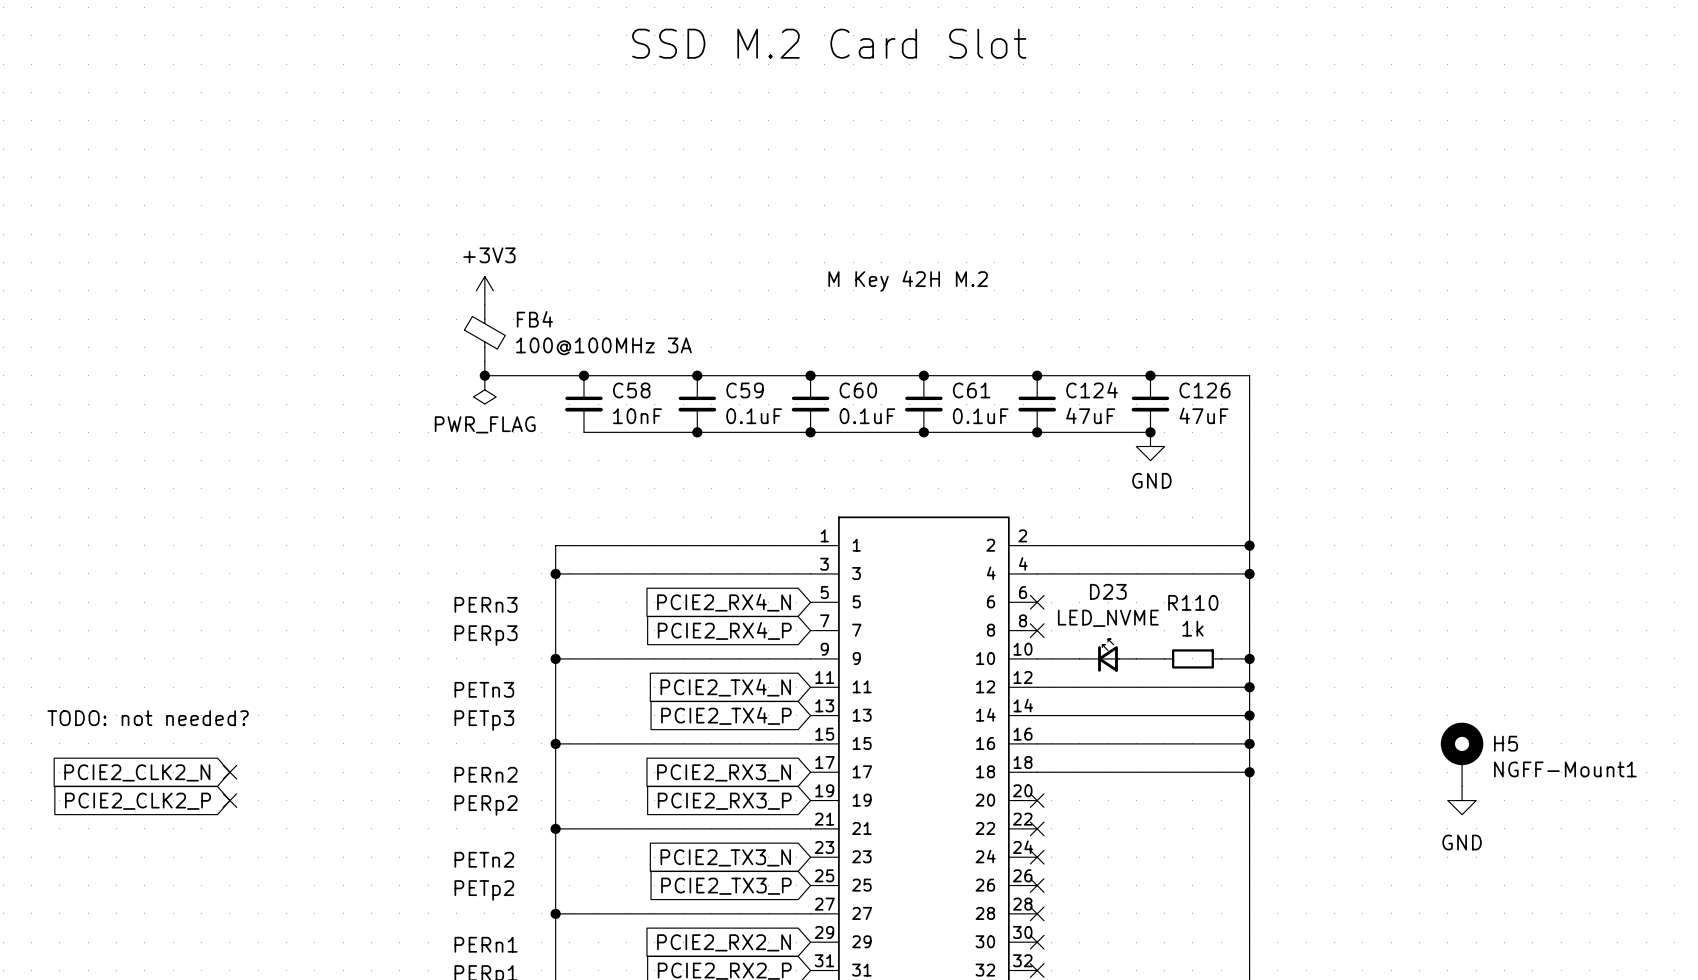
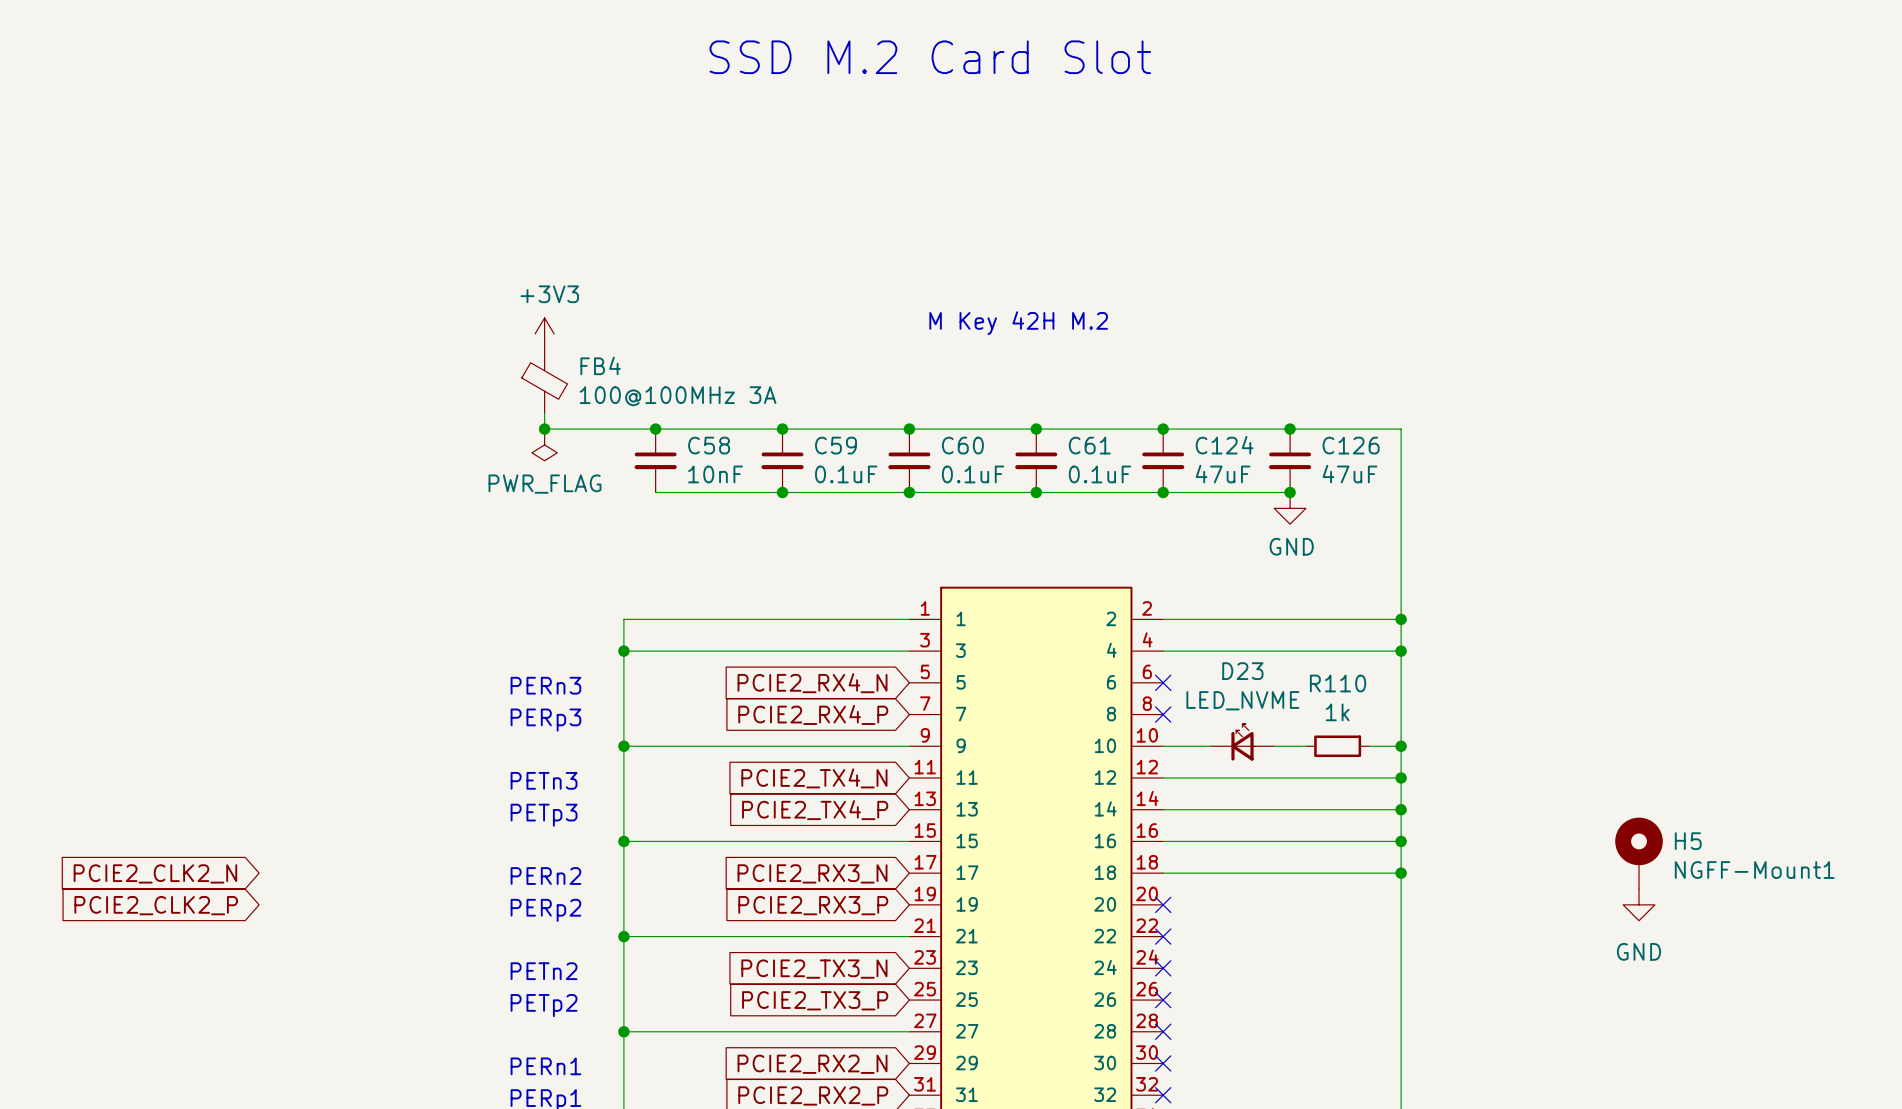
text: TODO: not needed? (148, 718) -> none
no-connect mark: (229, 772) -> none
no-connect mark: (229, 800) -> none

